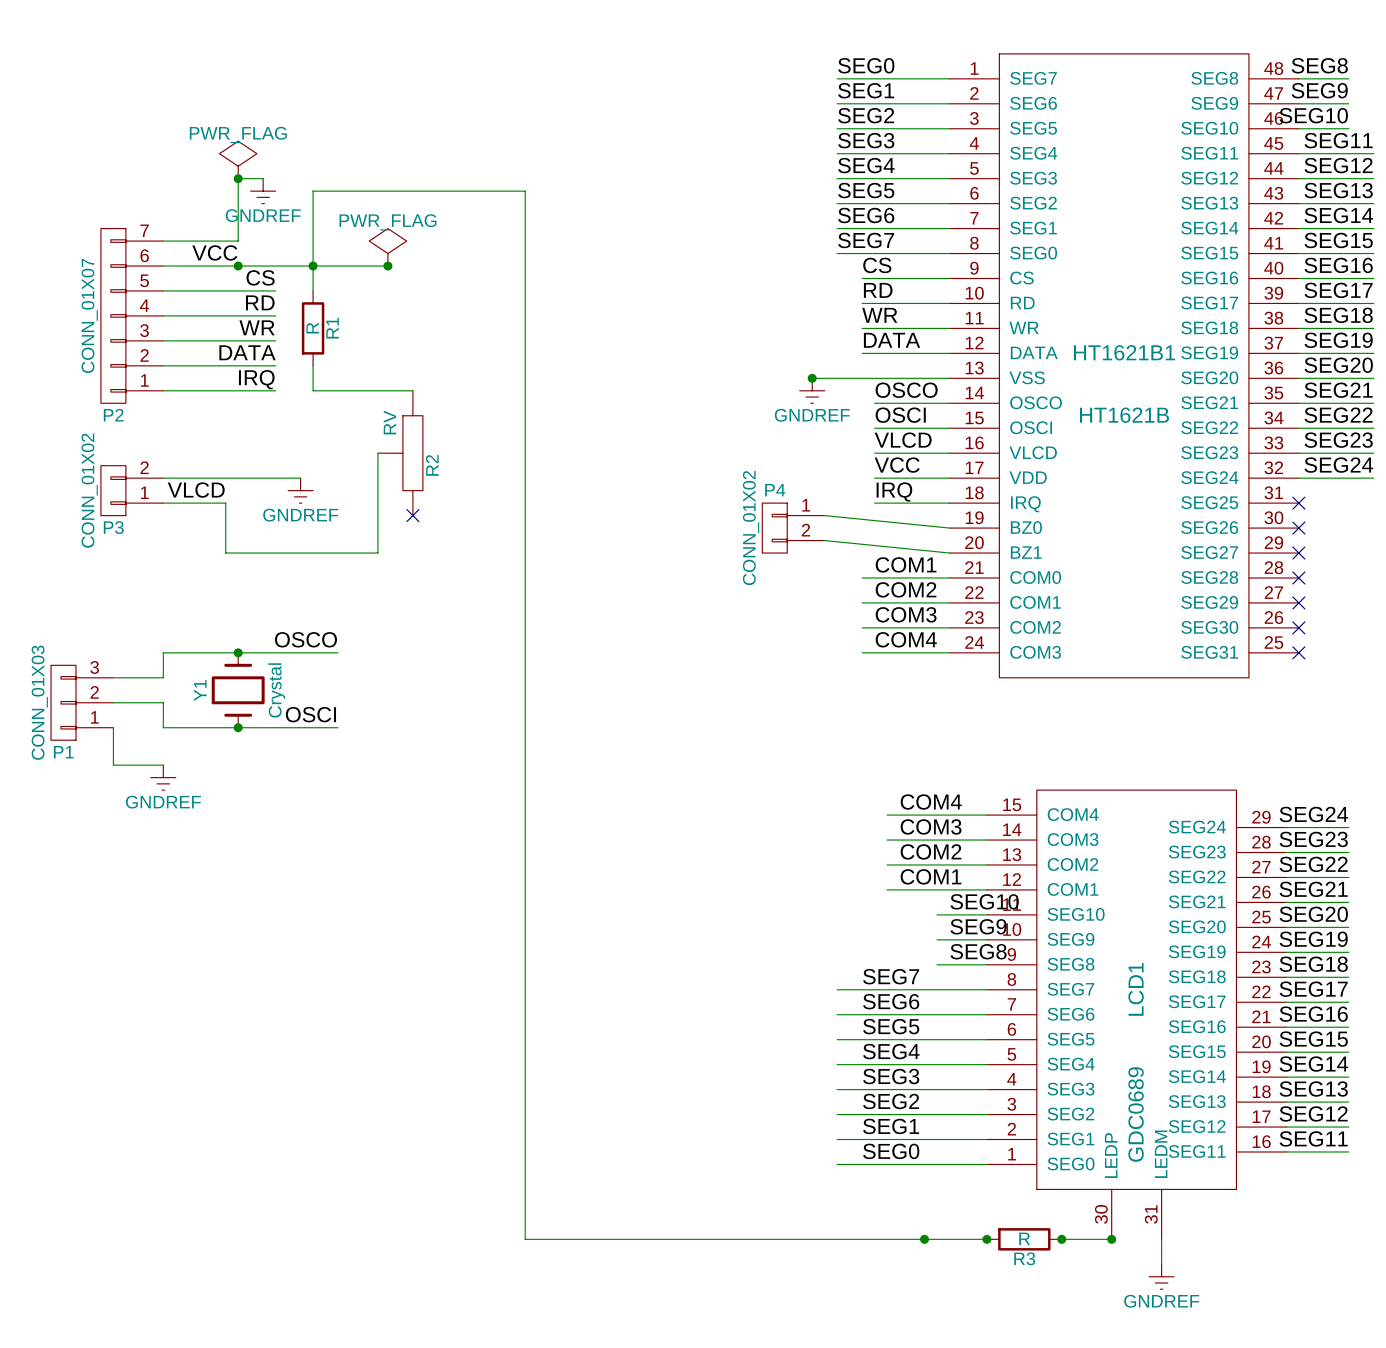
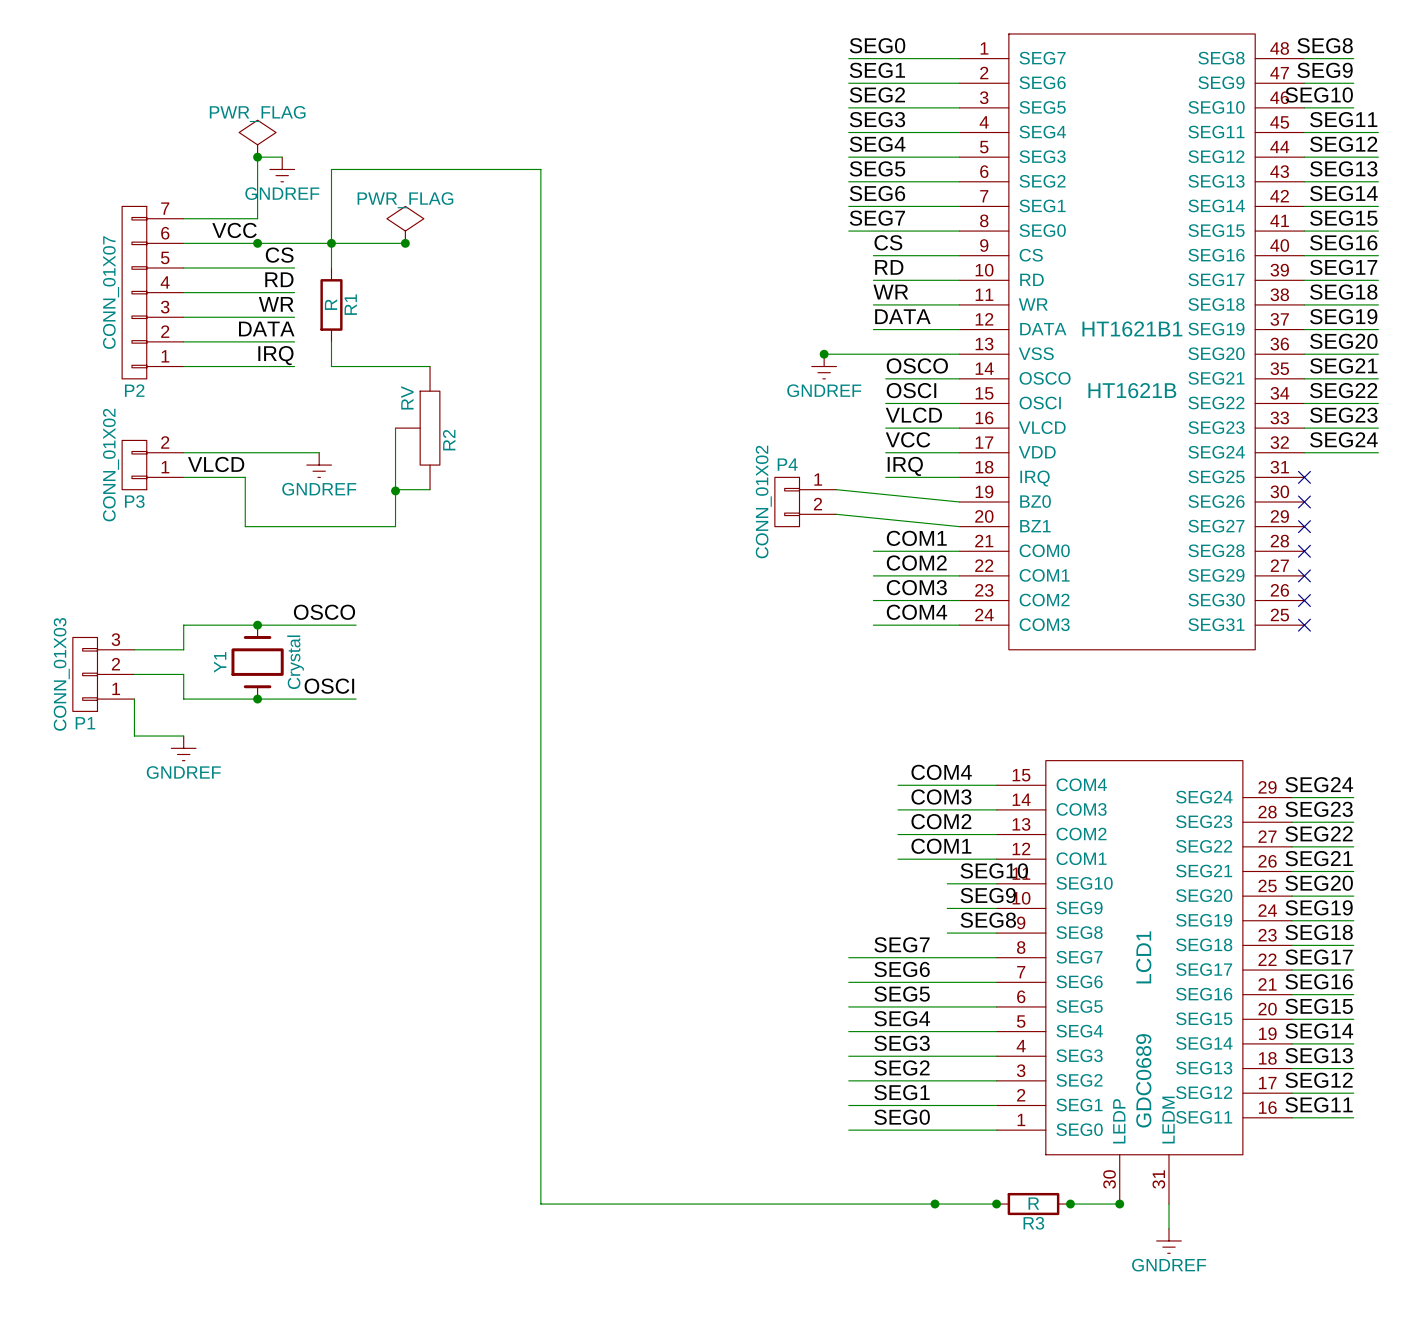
wire: none -> (395, 489) (430, 489)
no-connect mark: (412, 515) -> none
junction: none -> (395, 490)

